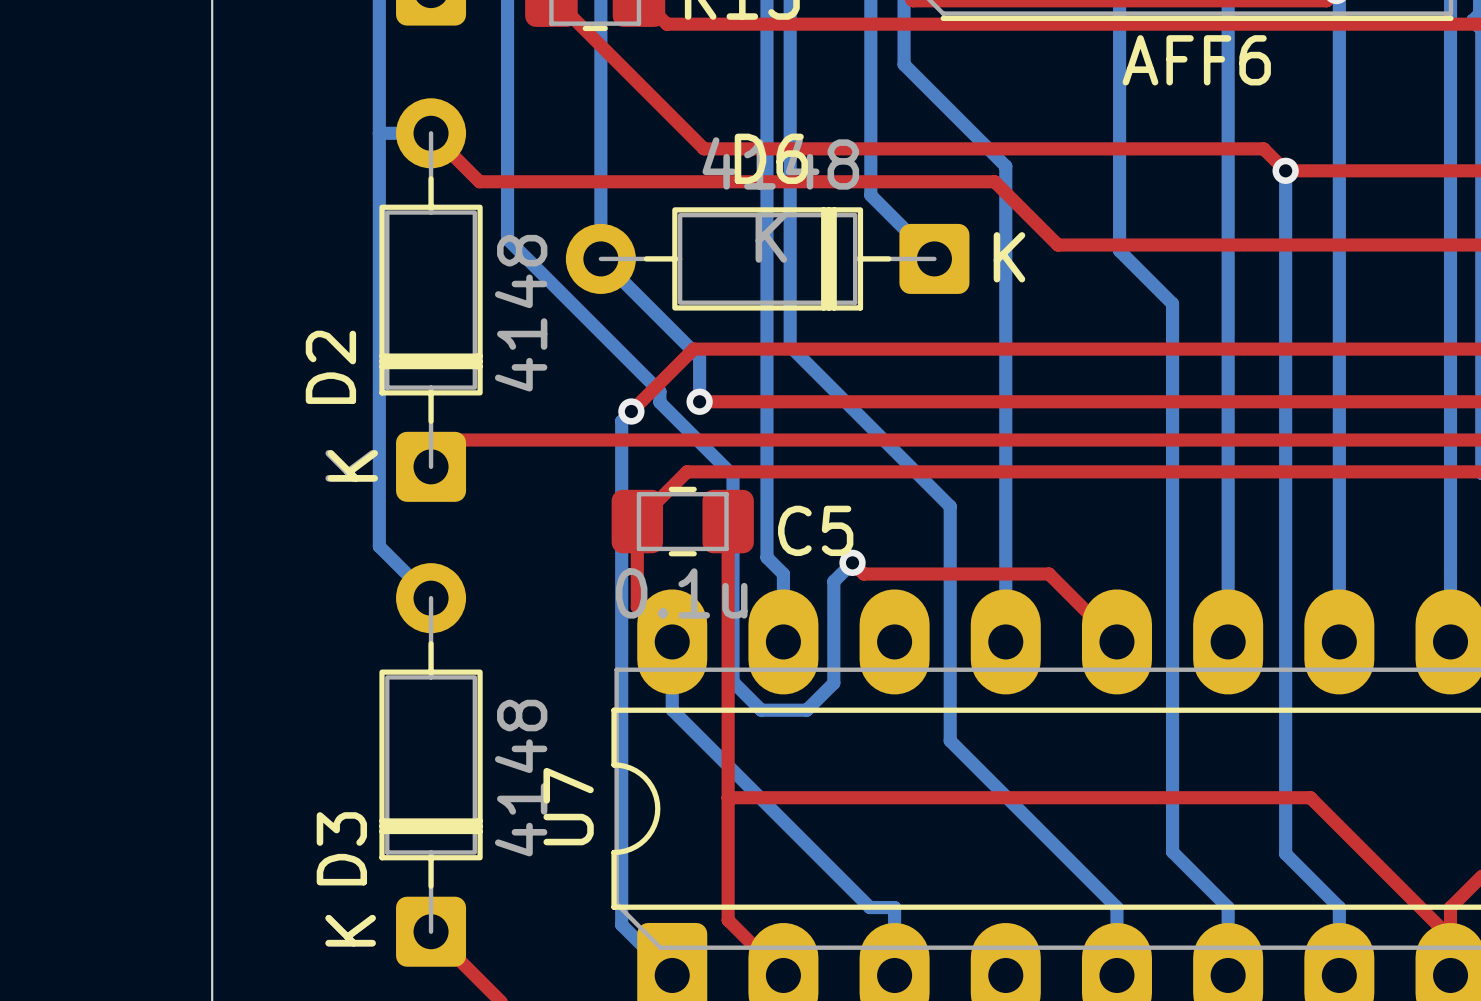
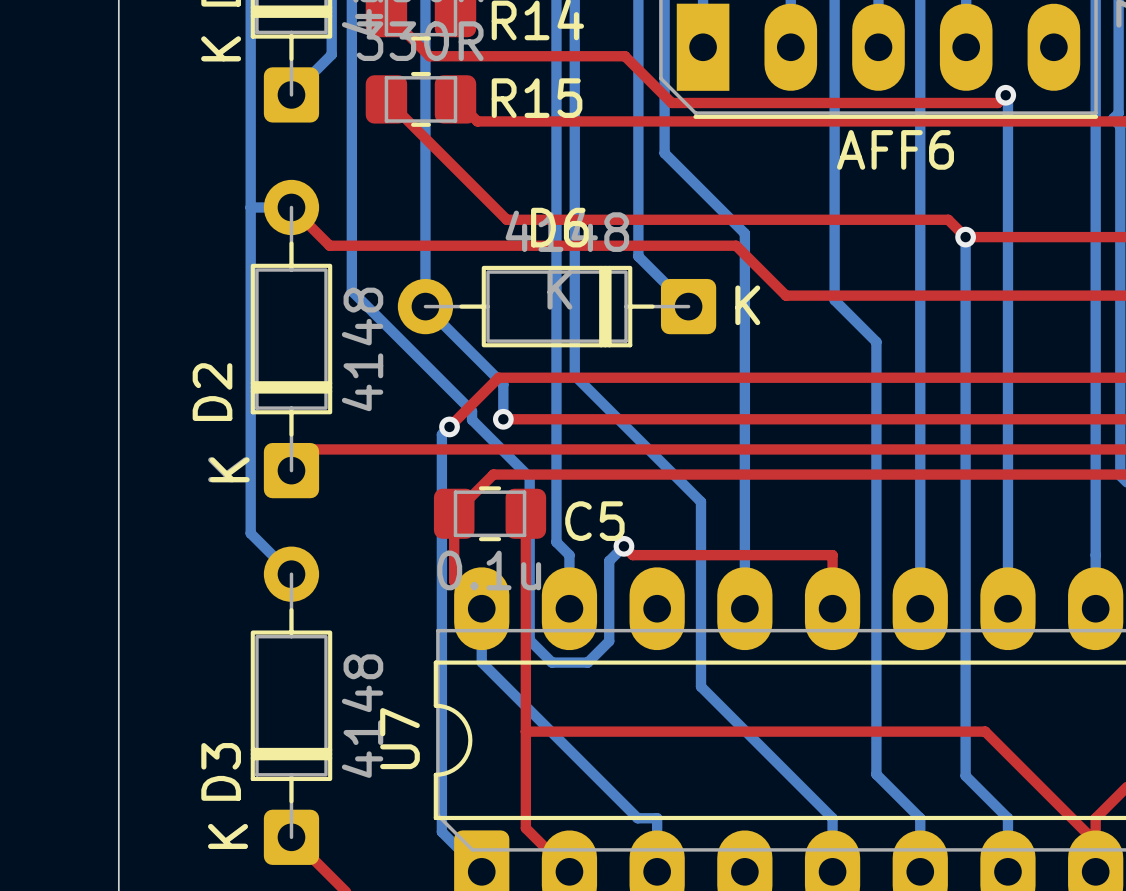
top track: (1049, 574) (1116, 641) -> (778, 555) (832, 555) (832, 608)

